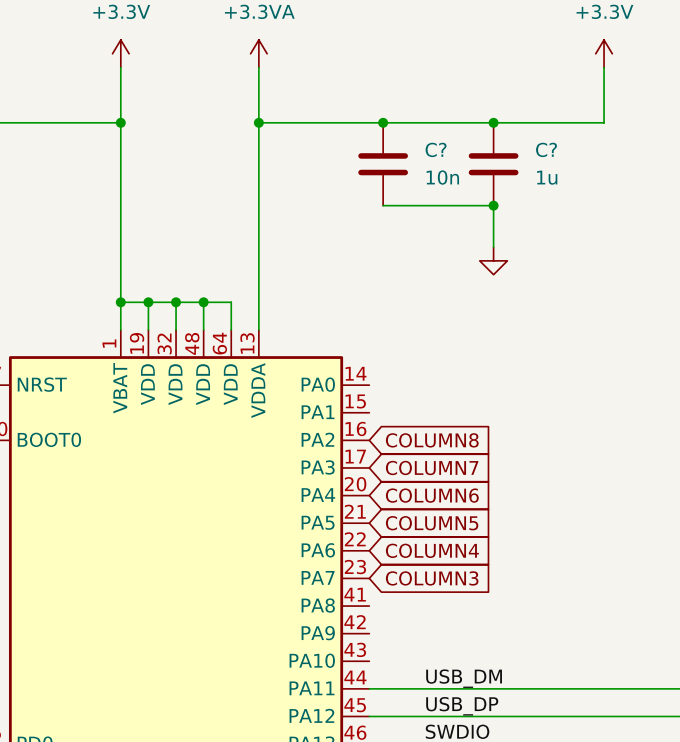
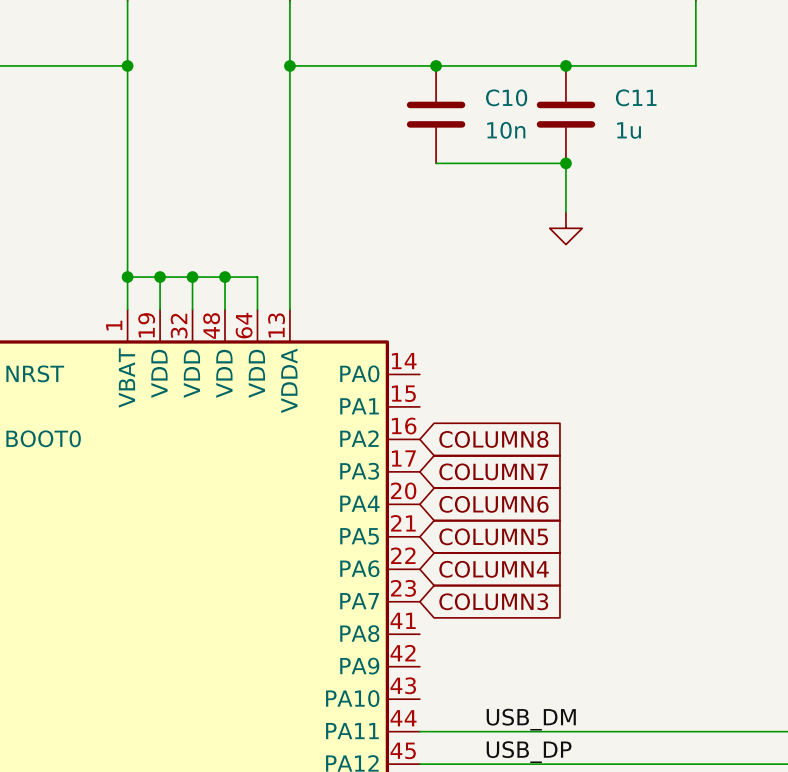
C? name: C? (436, 149) -> C10 (506, 97)
C? name: C? (546, 149) -> C11 (636, 97)

